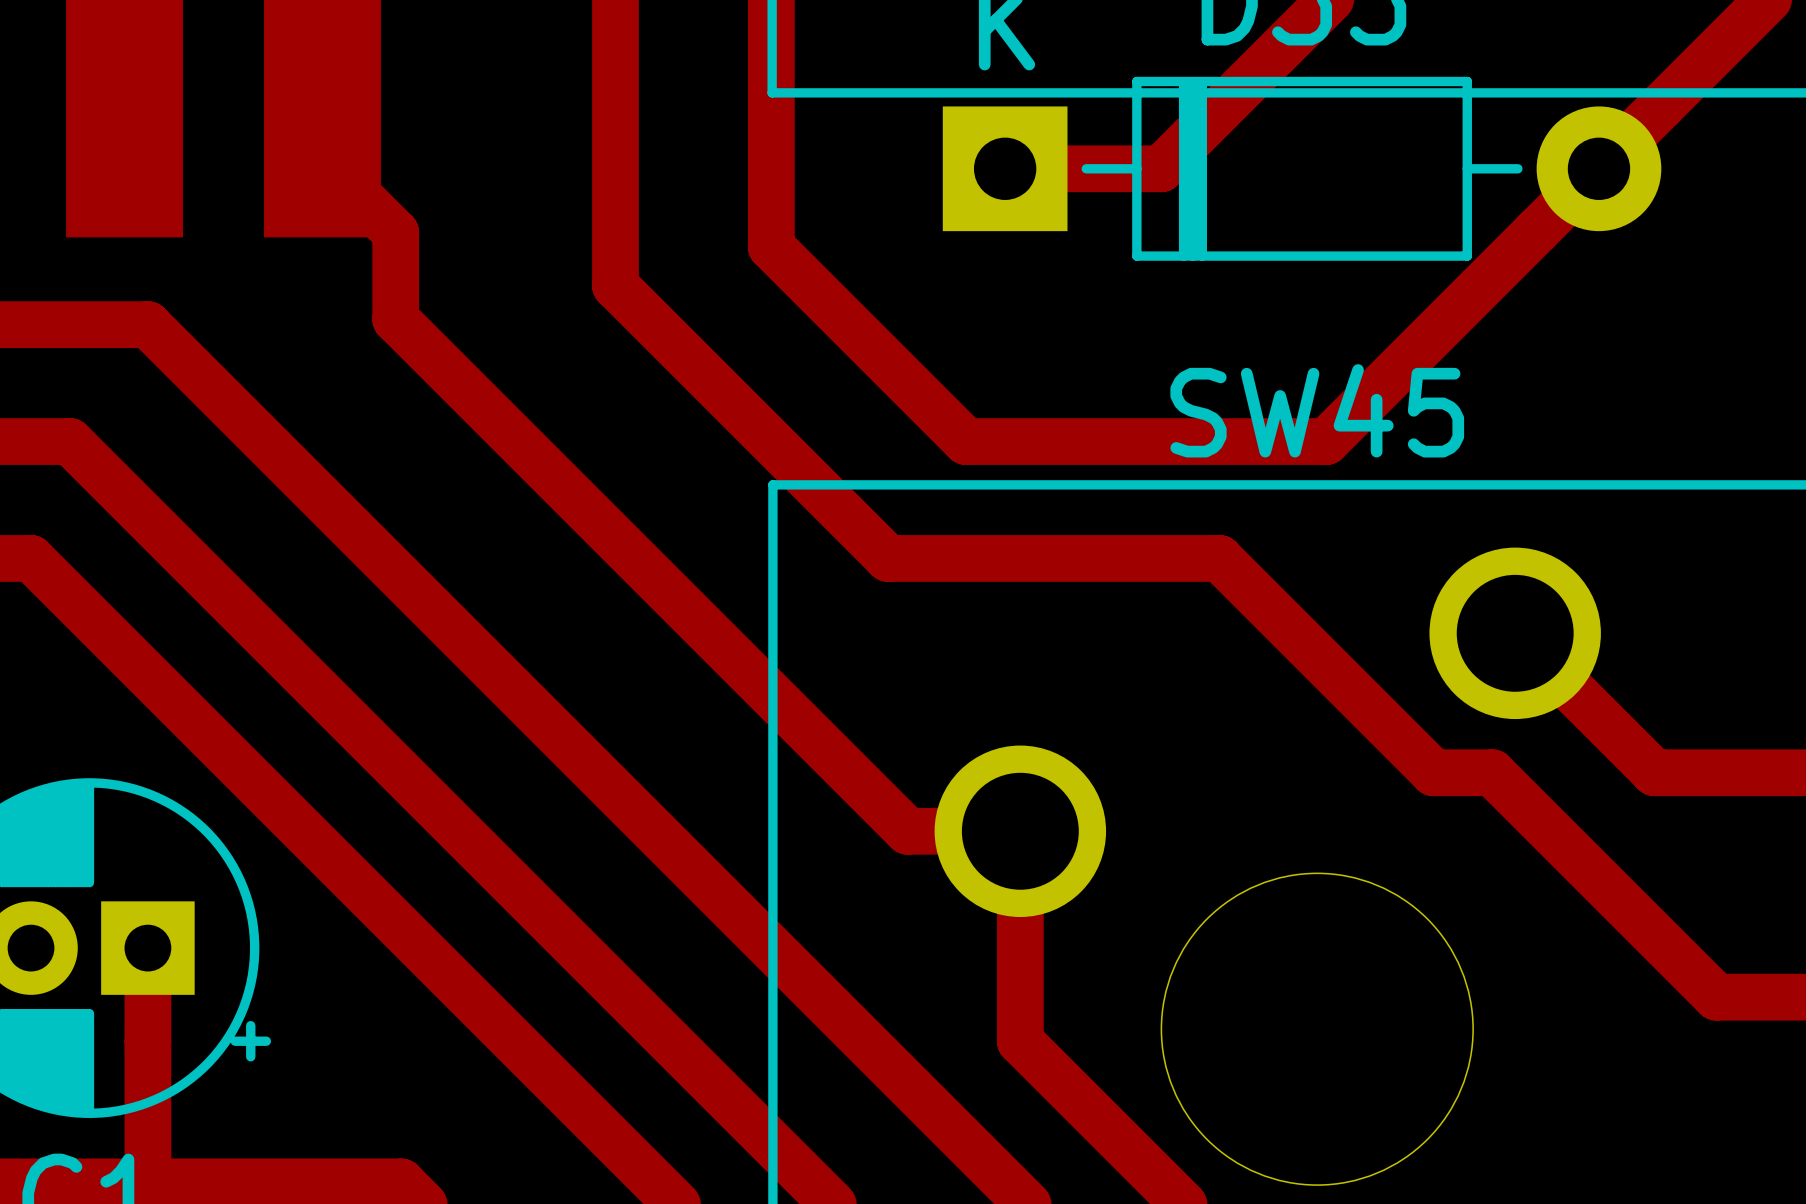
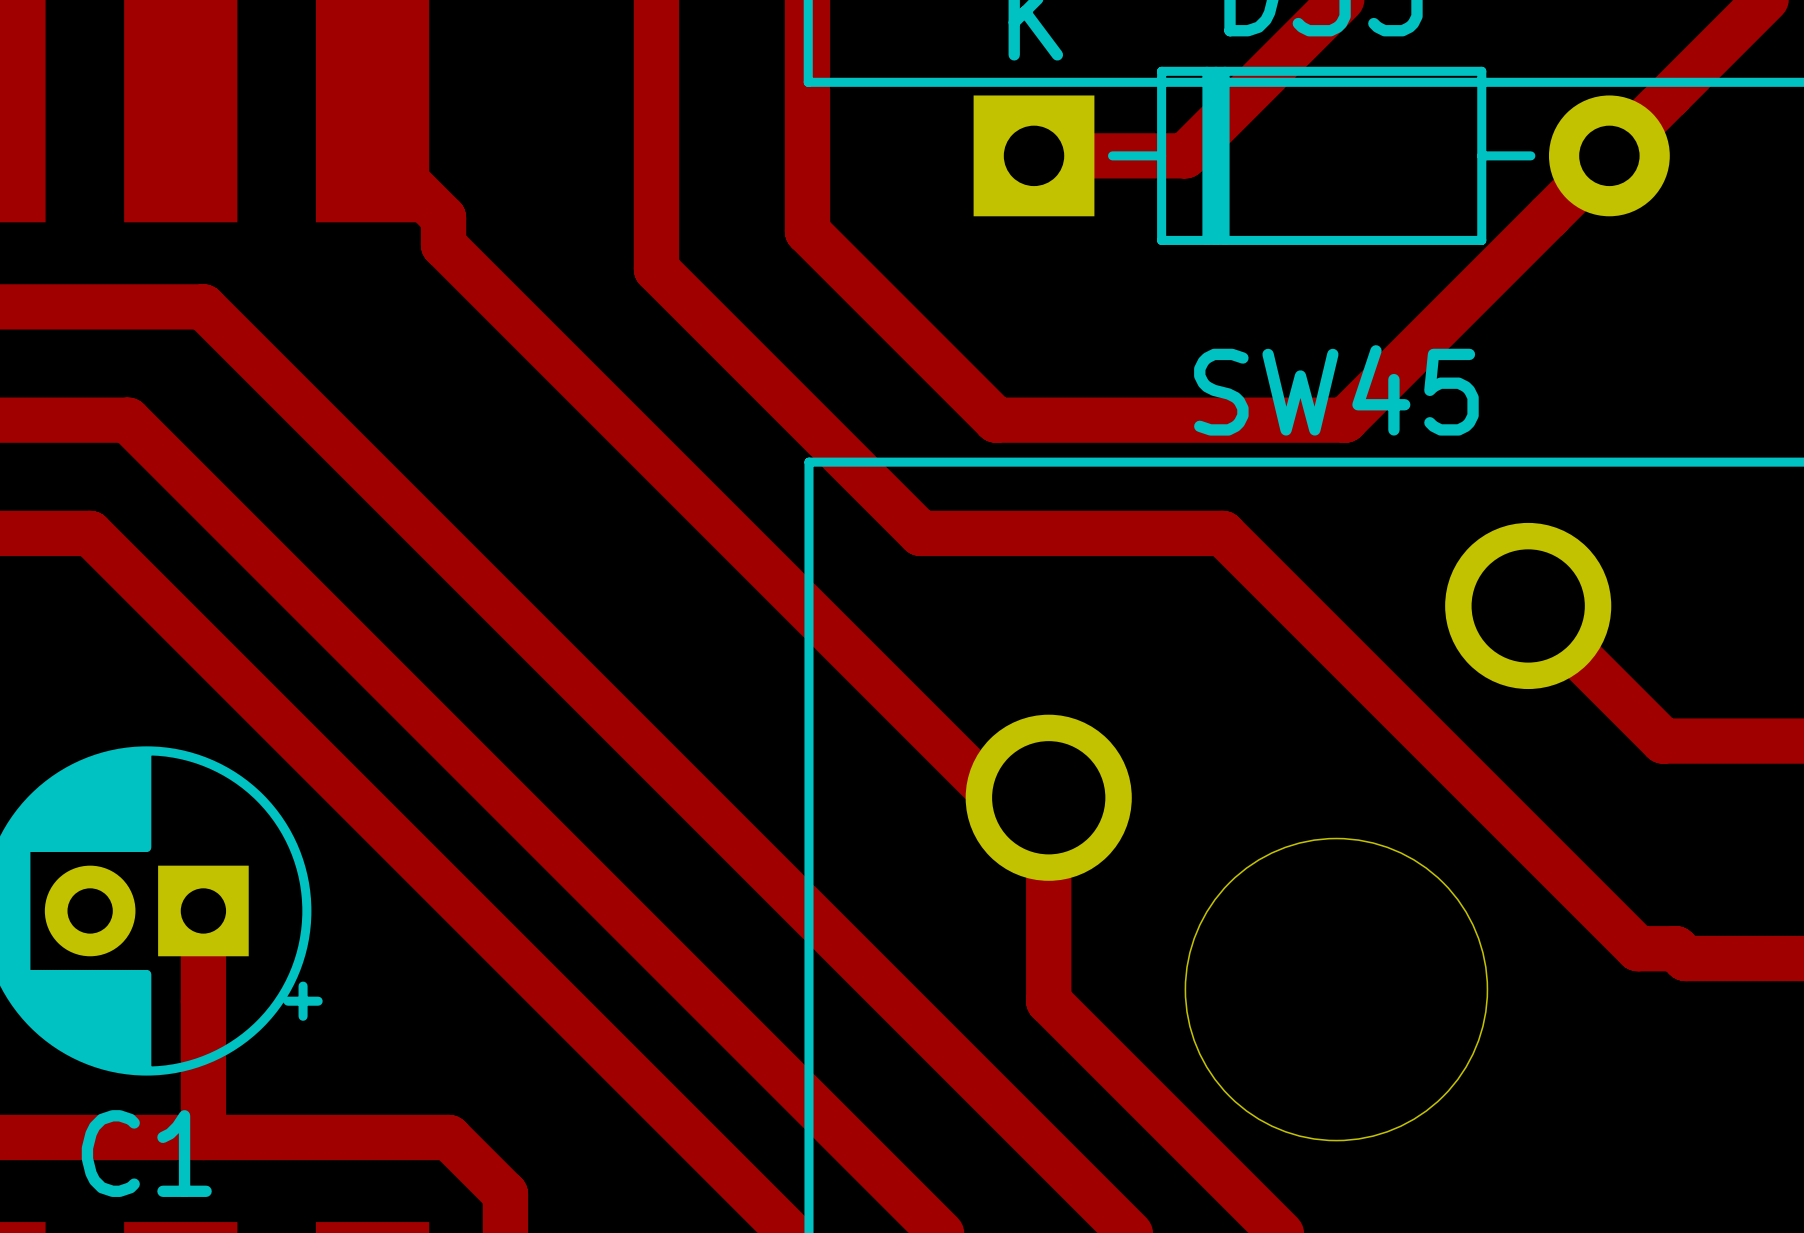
track: (395, 260) (395, 319) (907, 831) (966, 831) -> (443, 244) (996, 797)
track: (1199, 558) (1219, 558) (1433, 772) (1492, 772) (1716, 997) -> (1222, 533) (1638, 948) (1675, 948) (1685, 958) (1723, 958)

